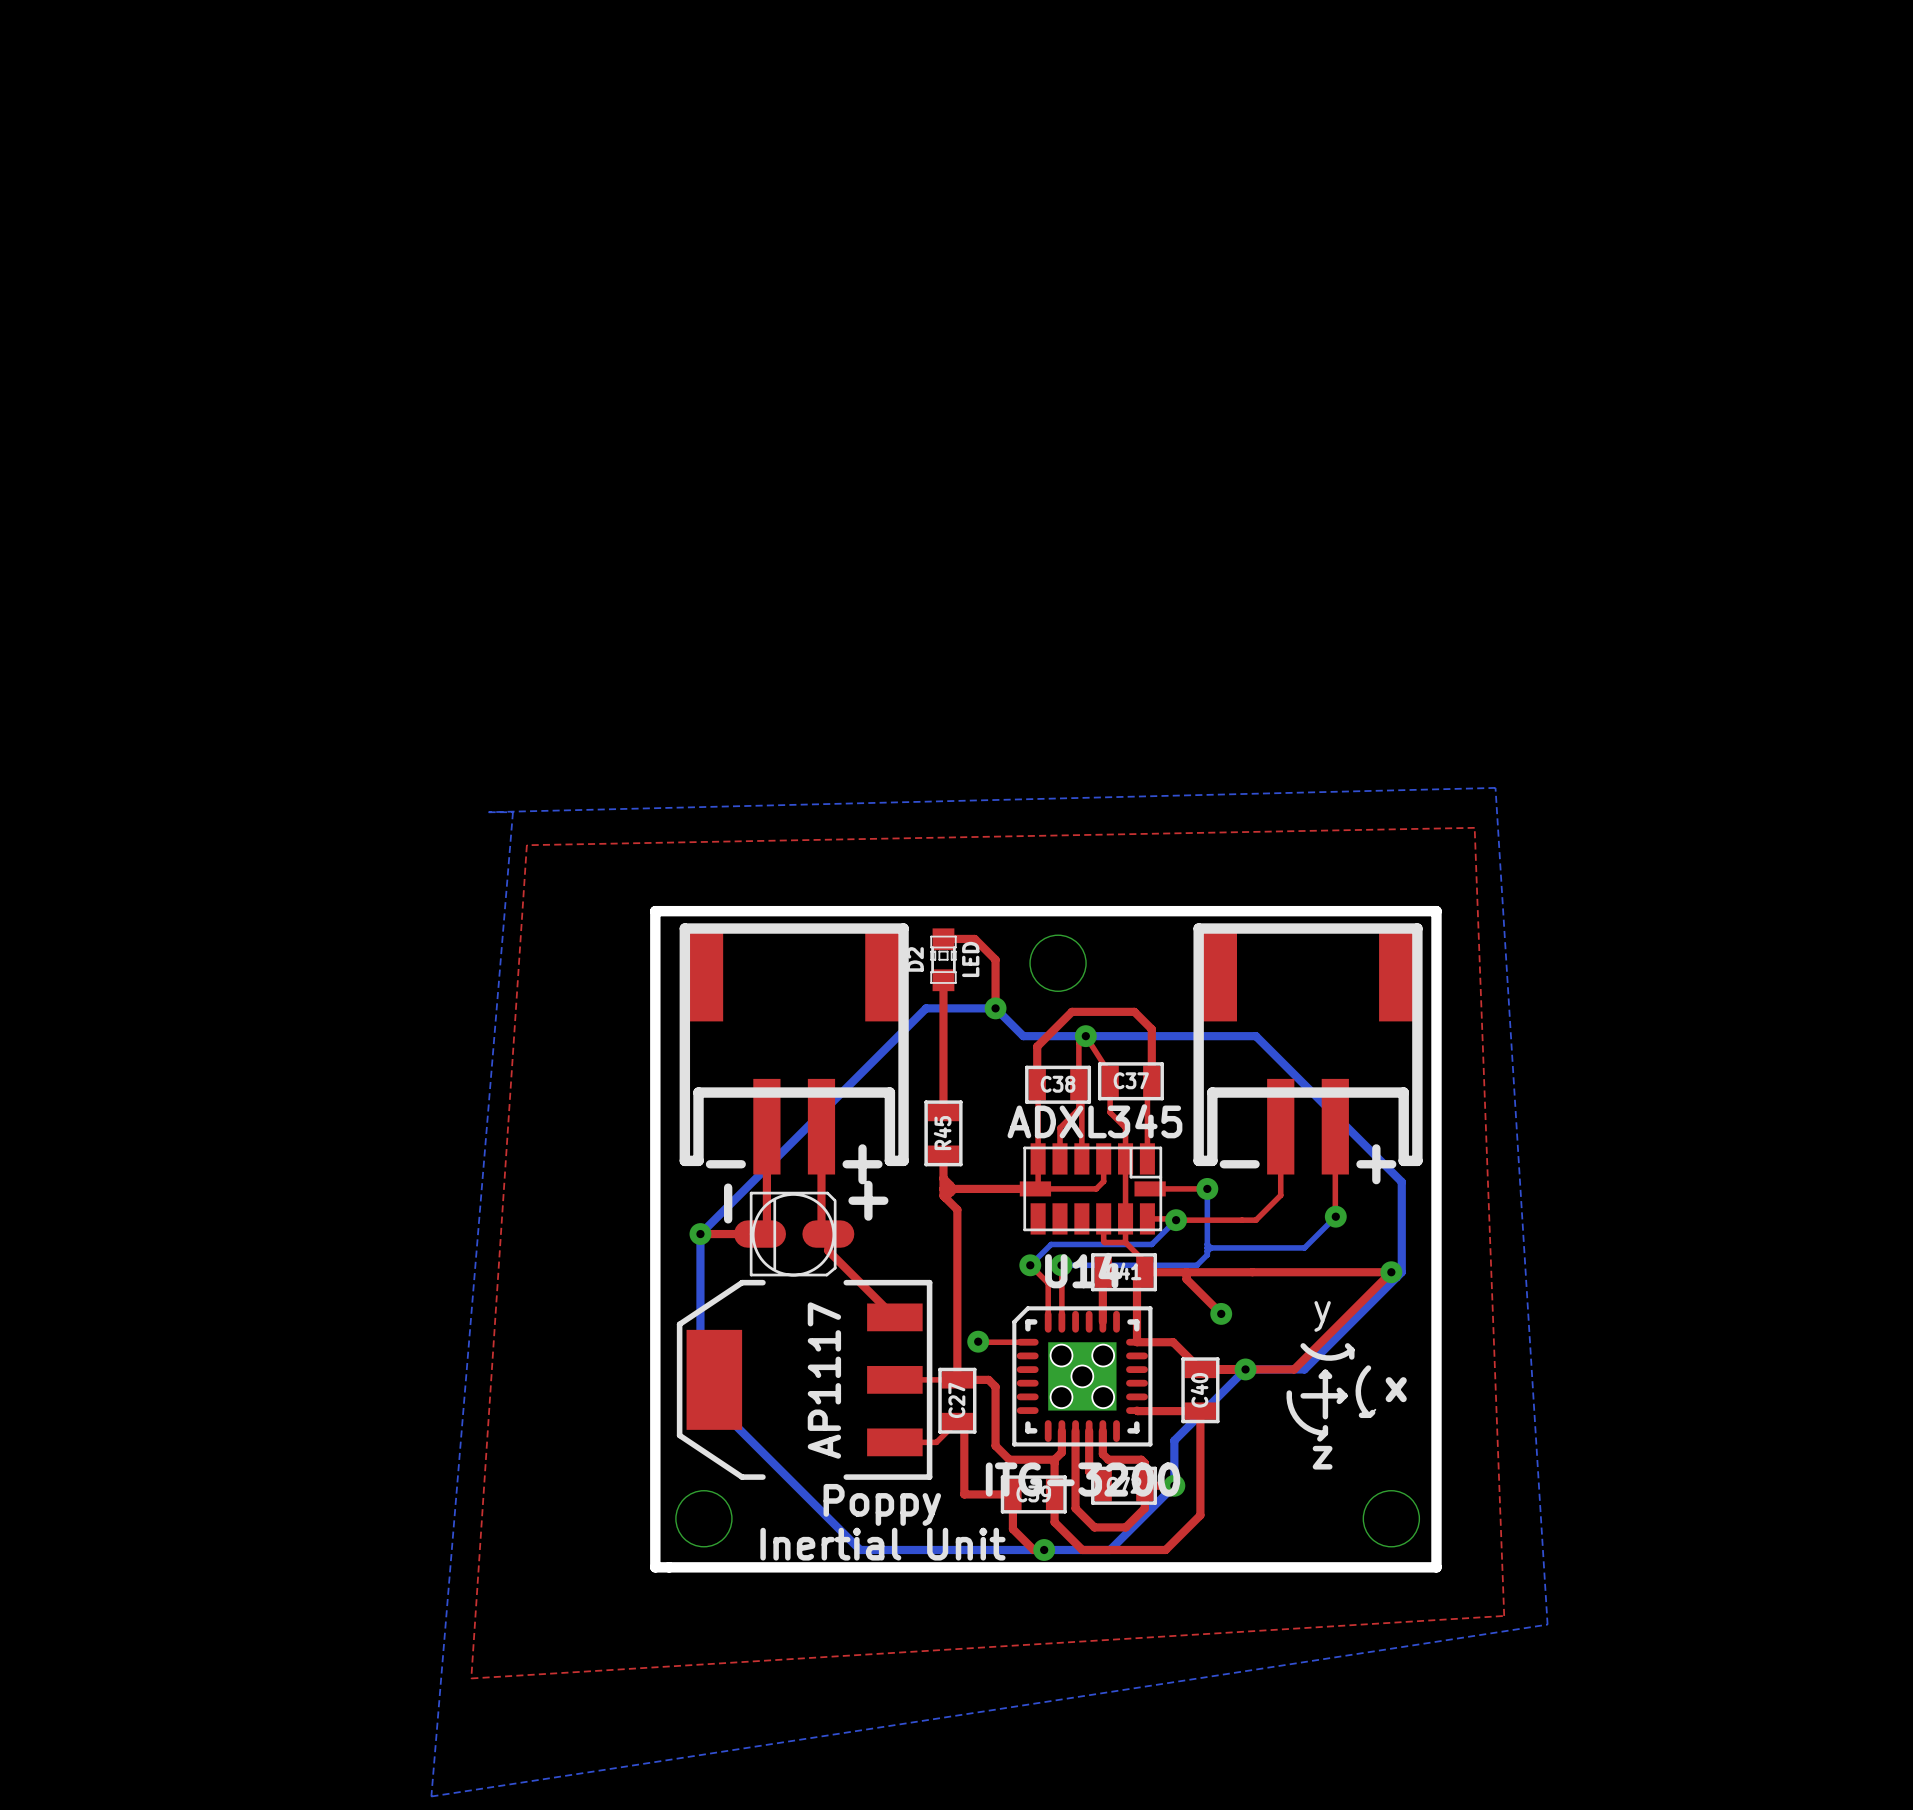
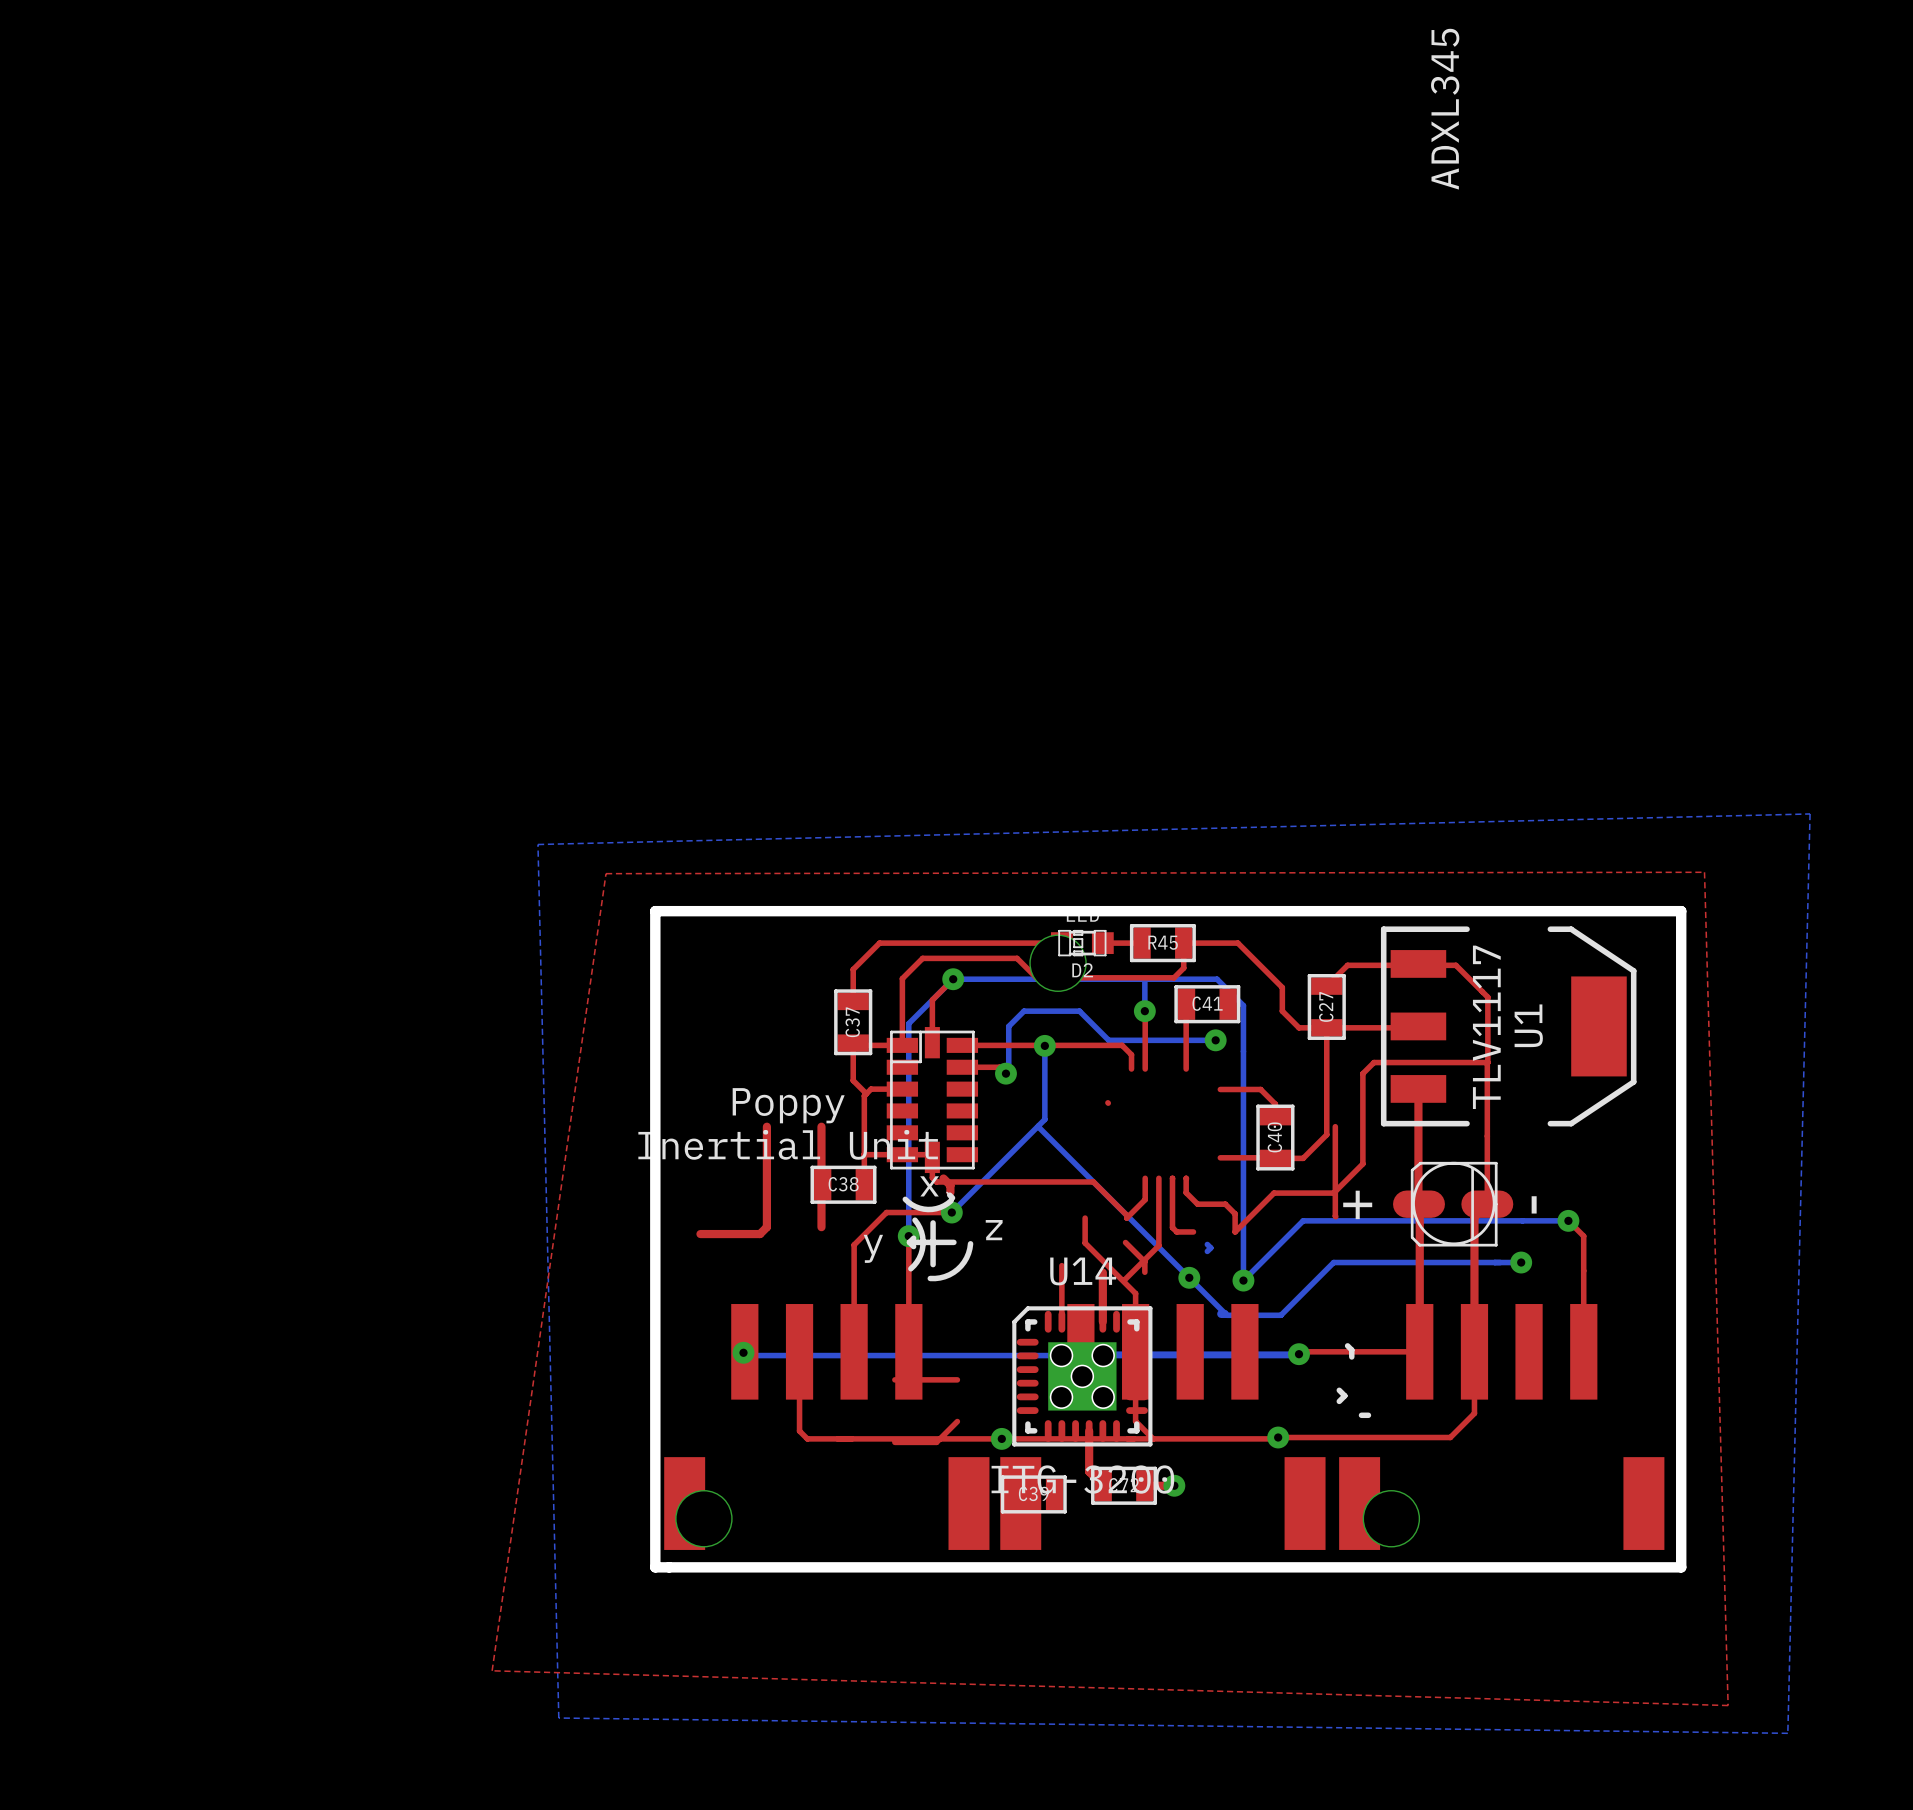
bottom zone outline: (1495, 787) (1547, 1624) (431, 1796) (512, 812) (488, 812) (1495, 787) -> (1810, 813) (537, 844) (558, 1718) (1787, 1733) (1810, 813)
top zone outline: (1474, 827) (1504, 1615) (471, 1678) (526, 845) (1474, 827) -> (1704, 872) (606, 873) (492, 1670) (1728, 1705) (1704, 872)
board edge: (1436, 911) (1436, 1567) -> (1436, 911) (1681, 911) (1681, 1567) (1436, 1567)
top track: (943, 938) (974, 938) (995, 959) (995, 1008) -> none
top track: none -> (1061, 943) (879, 943) (853, 969) (853, 1001)
top track: none -> (1102, 943) (1142, 943)
D2 rotation: 0° (943, 959) -> 90° counterclockwise (1082, 943)
D2 position: (943, 959) -> (1082, 943)
top track: none -> (953, 979) (932, 1000) (932, 1042)
via: none -> (953, 979)
bottom track: none -> (1144, 979) (1144, 1011)
top track: (943, 980) (943, 1112) -> none
top track: none -> (1326, 986) (1347, 965) (1455, 965) (1487, 997) (1487, 1062) (1373, 1062) (1362, 1073) (1362, 1163) (1333, 1193) (1274, 1193) (1235, 1231) (1235, 1213) (1225, 1204) (1197, 1204) (1186, 1192) (1186, 1178)
top track: none -> (1186, 1004) (1186, 1069)
bottom track: (926, 1008) (700, 1234) (700, 1390) (860, 1549) (1110, 1549) (1174, 1485) (1174, 1440) (1245, 1369) (1304, 1369) (1401, 1272) (1401, 1181) (1255, 1036) (1023, 1036) (995, 1008) (926, 1008) -> none
via: (995, 1008) -> none
via: none -> (1144, 1011)
top track: none -> (1145, 1011) (1145, 1069)
U1: none -> TLV1117 (1508, 1026)
top track: none -> (1326, 1027) (1326, 1134) (1303, 1158) (1220, 1157)
top track: none -> (1418, 1027) (1299, 1027) (1282, 1011) (1282, 987) (1237, 943) (1183, 943) (1183, 968) (1174, 977) (1036, 977) (1017, 958) (922, 958) (902, 978) (902, 1045) (855, 1045) (853, 1043) (853, 1080) (866, 1093)
via: (1085, 1036) -> none
bottom track: none -> (1215, 1040) (1108, 1040) (1079, 1011) (1024, 1011) (1008, 1026) (1008, 1070) (1005, 1073)
via: none -> (1215, 1040)
top track: none -> (962, 1045) (1122, 1045) (1131, 1054) (1131, 1069)
bottom track: none -> (1044, 1045) (1044, 1119) (951, 1212)
via: none -> (1044, 1045)
part: (794, 1048) -> none
part: (1308, 1048) -> none
top track: none -> (1487, 1062) (1487, 1204) (1474, 1217) (1474, 1413) (1450, 1437) (807, 1438) (799, 1431) (799, 1351)
top track: none -> (962, 1067) (999, 1067) (1005, 1073)
via: none -> (1005, 1073)
C37 rotation: 0° (1130, 1081) -> 90° clockwise (853, 1022)
C37 position: (1130, 1081) -> (853, 1022)
C38 position: (1058, 1084) -> (843, 1184)
top track: (1078, 1084) (1081, 1094) (1081, 1158) -> none
top track: none -> (902, 1089) (871, 1089) (864, 1095) (864, 1184)
top track: none -> (1220, 1089) (1260, 1089) (1275, 1104) (1275, 1116)
top track: none -> (1418, 1090) (1419, 1351) (1301, 1351) (1299, 1354)
part value position: ADXL345 (1094, 1121) -> ADXL345 (1445, 109)
bottom track: none -> (1038, 1125) (1226, 1315) (1280, 1315) (1333, 1262) (1521, 1262)
top track: (1280, 1126) (1280, 1195) (1255, 1220) (1147, 1218) -> none
R45 rotation: 0° (943, 1133) -> 90° clockwise (1162, 943)
R45 position: (943, 1133) -> (1162, 943)
top track: none -> (864, 1154) (929, 1154) (932, 1157) (932, 1177) (936, 1181) (1093, 1181) (1126, 1215) (1126, 1218) (1145, 1199) (1145, 1178)
top track: (943, 1154) (943, 1195) (957, 1209) (957, 1379) (988, 1379) (995, 1386) (995, 1445) (1009, 1459) (1054, 1459) -> none
top track: (1060, 1158) (1060, 1127) (1078, 1109) (1078, 1043) (1085, 1036) (1110, 1074) (1110, 1112) (1125, 1127) (1125, 1242) (1103, 1241) (1103, 1218) -> none
top track: (1103, 1158) (1103, 1181) (1096, 1188) (1035, 1188) -> none
top track: (1147, 1158) (1147, 1096) (1151, 1081) (1151, 1029) (1134, 1011) (1071, 1011) (1037, 1046) (1038, 1186) (1035, 1188) -> none
top track: none -> (1158, 1178) (1158, 1245) (1125, 1279)
top track: none -> (1172, 1178) (1172, 1227) (1176, 1231) (1193, 1231)
top track: (943, 1188) (1035, 1188) -> none
part rotation: 0° (1092, 1188) -> 90° counterclockwise (932, 1100)
part position: (1092, 1188) -> (932, 1100)
top track: (1150, 1188) (1207, 1188) -> none
bottom track: (1207, 1188) (1207, 1254) (1196, 1265) (1061, 1265) -> none
via: (1207, 1188) -> none
line: none -> (946, 1192) (952, 1197) (949, 1195)
part: none -> (1453, 1204)
top track: none -> (951, 1212) (886, 1212) (854, 1244) (854, 1351)
via: none -> (951, 1212)
bottom track: (1335, 1216) (1304, 1247) (1207, 1247) -> none
via: (1335, 1216) -> none
top track: none -> (1085, 1218) (1085, 1243) (1135, 1293) (1135, 1421) (1153, 1438)
line: none -> (915, 1220) (921, 1231) (923, 1245) (919, 1258) (910, 1268)
bottom track: (1176, 1220) (1151, 1244) (1051, 1244) (1030, 1265) -> none
via: (1176, 1220) -> none
top track: none -> (1568, 1220) (1583, 1236) (1583, 1351)
bottom track: none -> (1568, 1220) (1303, 1220) (1243, 1280) (1243, 1005) (1217, 979) (953, 979) (908, 1023) (908, 1236)
via: none -> (1568, 1220)
line: none -> (933, 1222) (933, 1264)
via: (700, 1234) -> none
part: (794, 1234) -> none
top track: (828, 1234) (828, 1250) (894, 1317) -> none
top track: none -> (908, 1236) (908, 1351)
via: none -> (908, 1236)
line: none -> (913, 1238) (909, 1242) (913, 1246)
line: none -> (910, 1242) (953, 1242)
line: none -> (970, 1243) (966, 1257) (957, 1269) (944, 1276) (930, 1278)
via: none -> (1521, 1262)
top track: (1030, 1265) (1048, 1283) (1048, 1321) -> none
via: (1030, 1265) -> none
via: (1061, 1265) -> none
C41 position: (1124, 1272) -> (1207, 1004)
top track: (1144, 1272) (1137, 1280) (1137, 1342) (1173, 1342) (1200, 1369) (1294, 1369) (1391, 1272) (1144, 1272) -> none
top track: (1186, 1272) (1186, 1279) (1221, 1313) -> none
via: (1391, 1272) -> none
via: none -> (1189, 1277)
via: none -> (1243, 1280)
via: (1221, 1313) -> none
text position: y (1322, 1316) -> y (873, 1248)
top track: (978, 1341) (1027, 1342) -> none
via: (978, 1341) -> none
line: (1303, 1345) (1313, 1354) (1326, 1358) (1339, 1356) (1351, 1350) -> (905, 1199) (915, 1206) (927, 1209) (940, 1207) (951, 1200)
via: none -> (743, 1352)
bottom track: none -> (1078, 1352) (1299, 1354) (735, 1355)
via: none -> (1299, 1354)
line: (1368, 1368) (1361, 1378) (1358, 1390) (1360, 1403) (1367, 1413) -> none
via: (1245, 1369) -> none
line: (1325, 1373) (1325, 1416) -> none
line: (1321, 1376) (1325, 1372) (1329, 1376) -> none
part: AP1117 (804, 1379) -> none
text rotation: 0° (1396, 1389) -> 180° (929, 1186)
text position: x (1396, 1389) -> x (929, 1186)
C40 position: (1200, 1390) -> (1275, 1137)
line: (1289, 1393) (1291, 1407) (1298, 1420) (1309, 1429) (1324, 1433) -> none
line: (1303, 1395) (1344, 1395) -> none
C27 position: (957, 1400) -> (1326, 1006)
line: (1375, 1409) (1369, 1415) (1372, 1412) -> none
top track: (1137, 1410) (1200, 1411) (1200, 1515) (1165, 1549) (1082, 1549) (1054, 1522) (1054, 1459) -> none
part: none -> (826, 1426)
part: none -> (1162, 1426)
part: none -> (1501, 1426)
line: (1325, 1427) (1325, 1433) (1319, 1438) -> none
top track: (964, 1428) (964, 1494) (1012, 1494) (1012, 1529) (1033, 1549) (1044, 1549) -> none
top track: (1061, 1431) (1061, 1452) (1054, 1459) -> none
top track: (1075, 1431) (1075, 1508) (1094, 1527) (1125, 1527) (1144, 1508) (1144, 1463) (1141, 1459) (1108, 1459) (1102, 1454) (1102, 1431) -> none
via: none -> (1278, 1437)
via: none -> (1001, 1438)
text rotation: 0° (1322, 1457) -> 180° (994, 1230)
text position: z (1322, 1457) -> z (994, 1230)
text position: Poppy (882, 1504) -> Poppy (788, 1105)
text position: Inertial Unit (882, 1544) -> Inertial Unit (788, 1144)
via: (1044, 1549) -> none

